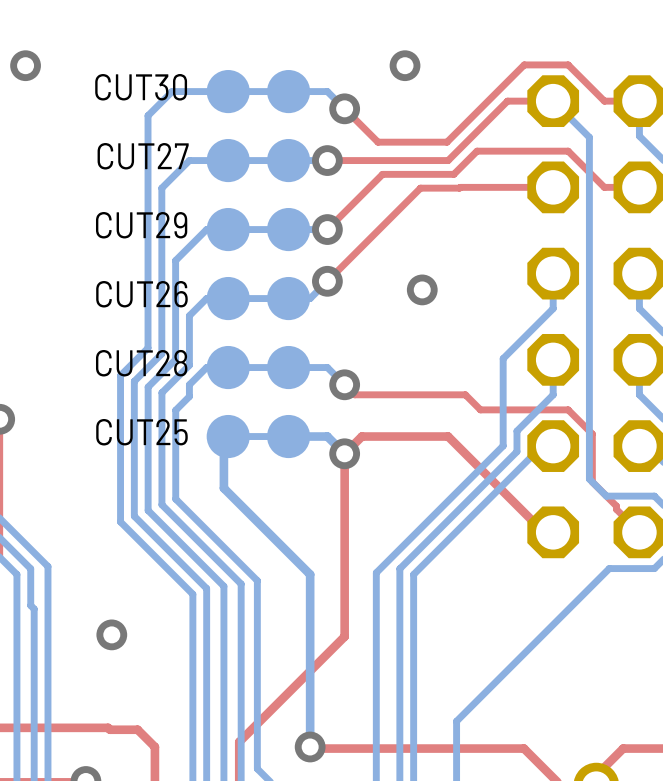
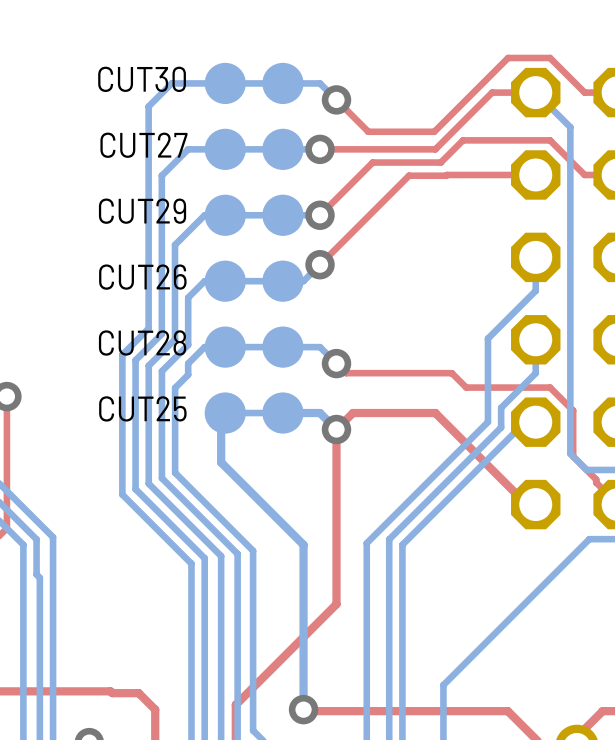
via: (25, 65) -> none
via: (405, 65) -> none
via: (422, 289) -> none
via: (111, 634) -> none

